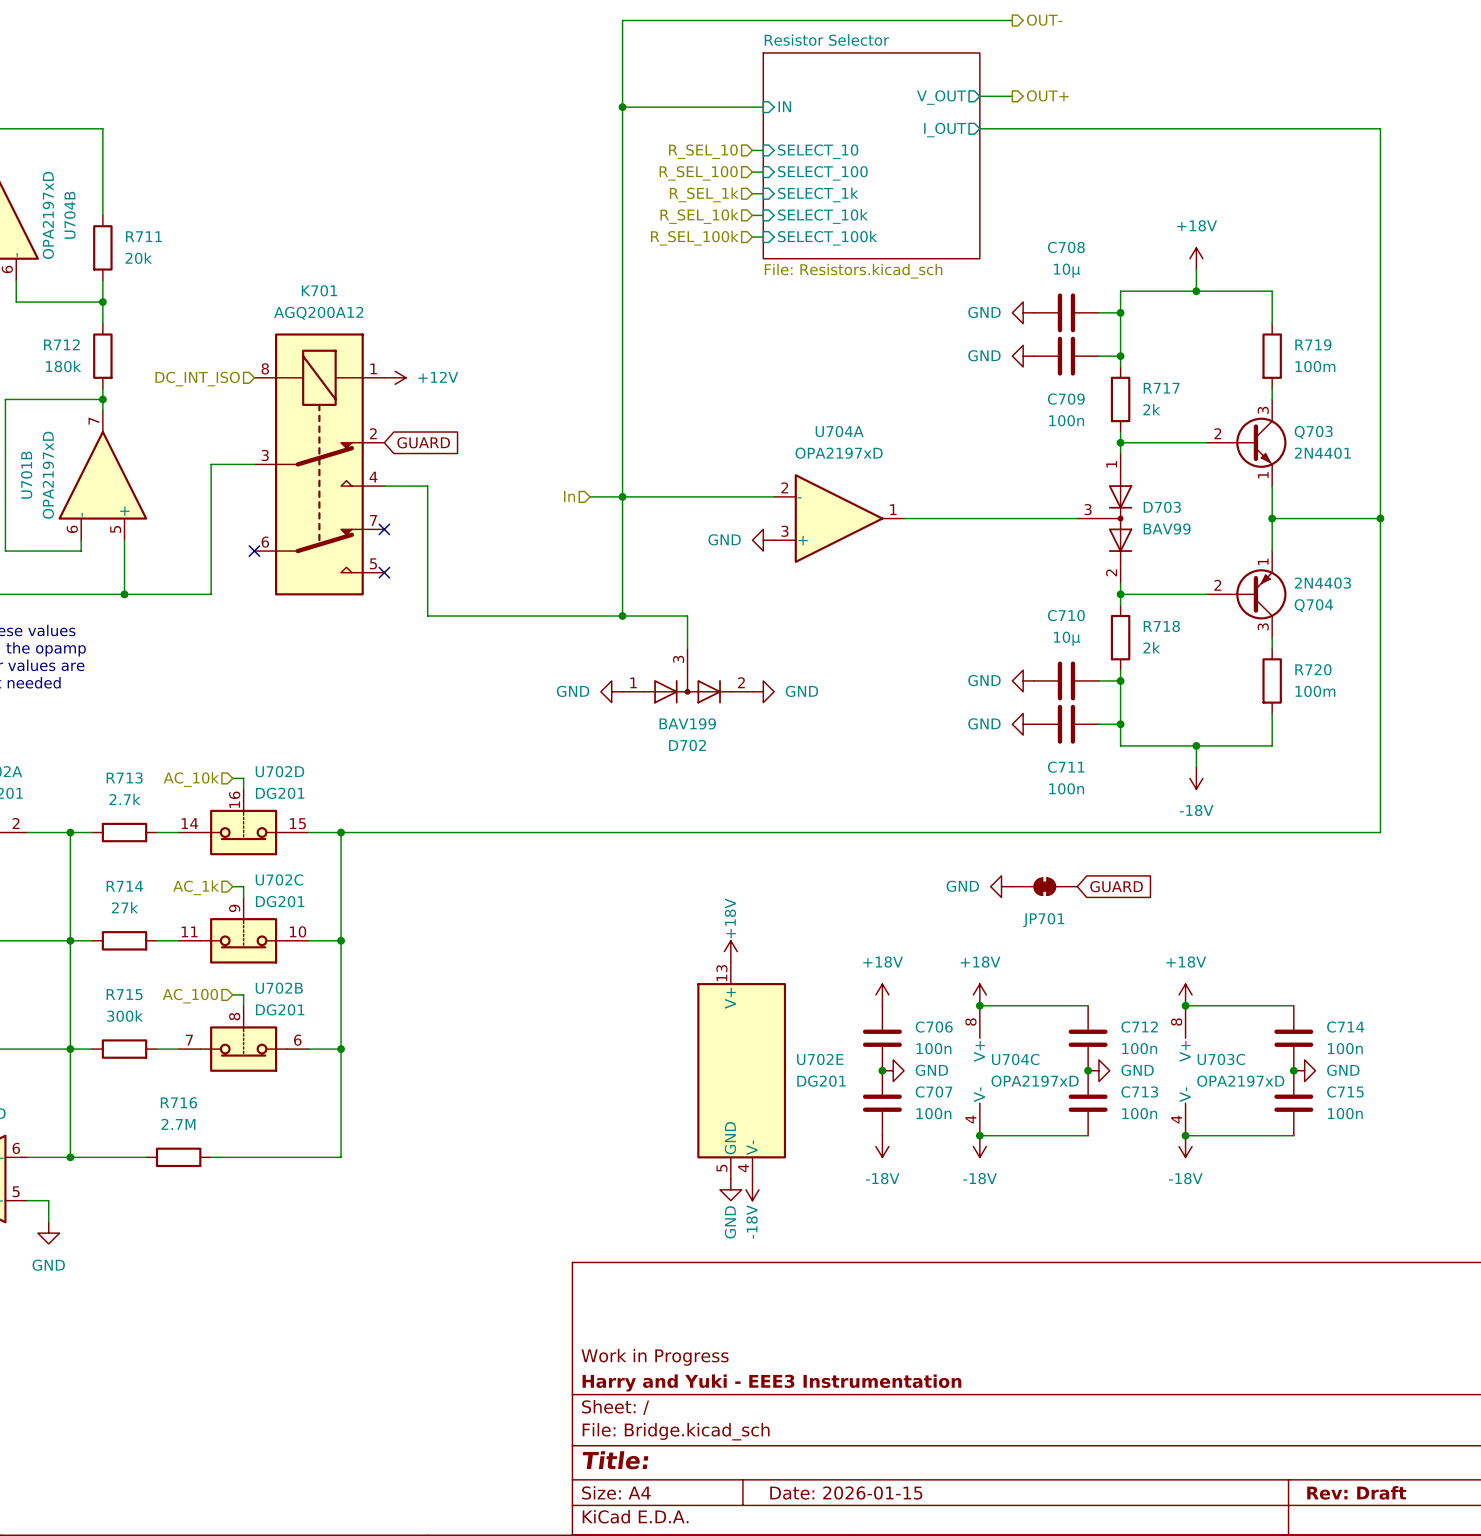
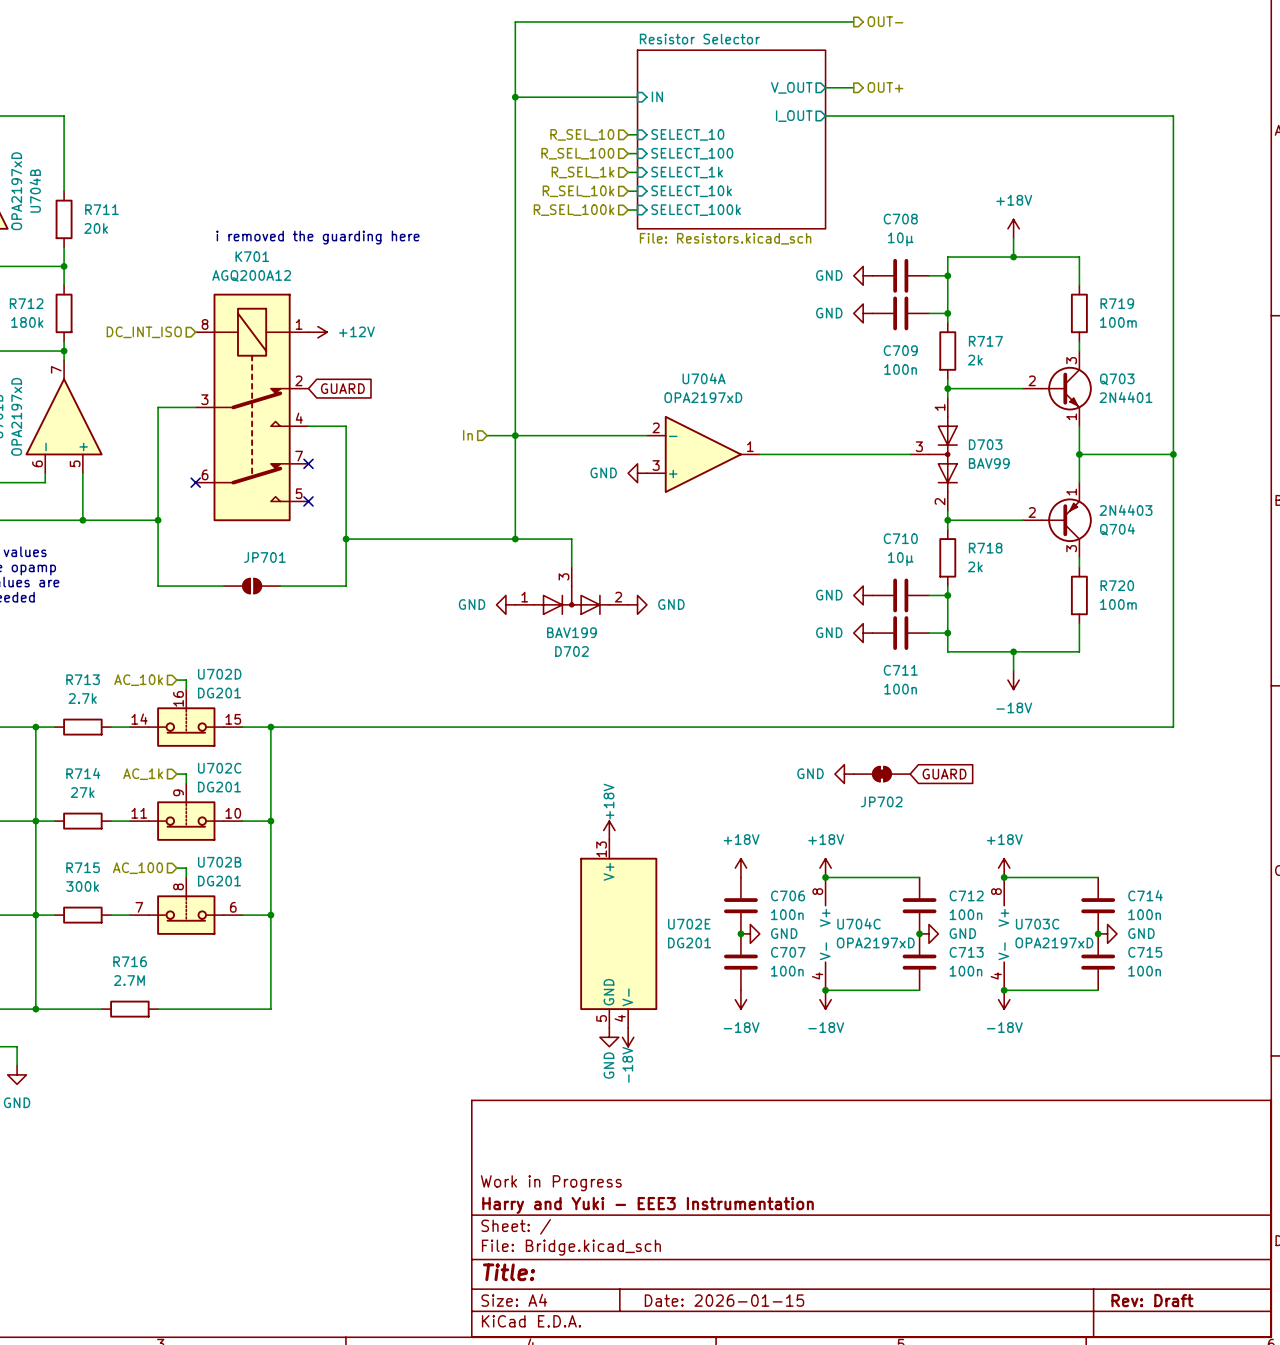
text: none -> i removed the guarding here (317, 237)
wire: none -> (158, 520) (158, 586) (223, 586)
junction: none -> (158, 520)
wire: none -> (346, 539) (346, 586) (280, 586)
junction: none -> (346, 539)
JP701: none -> (252, 586)
JP701 name: JP701 (1043, 920) -> JP702 (881, 801)

